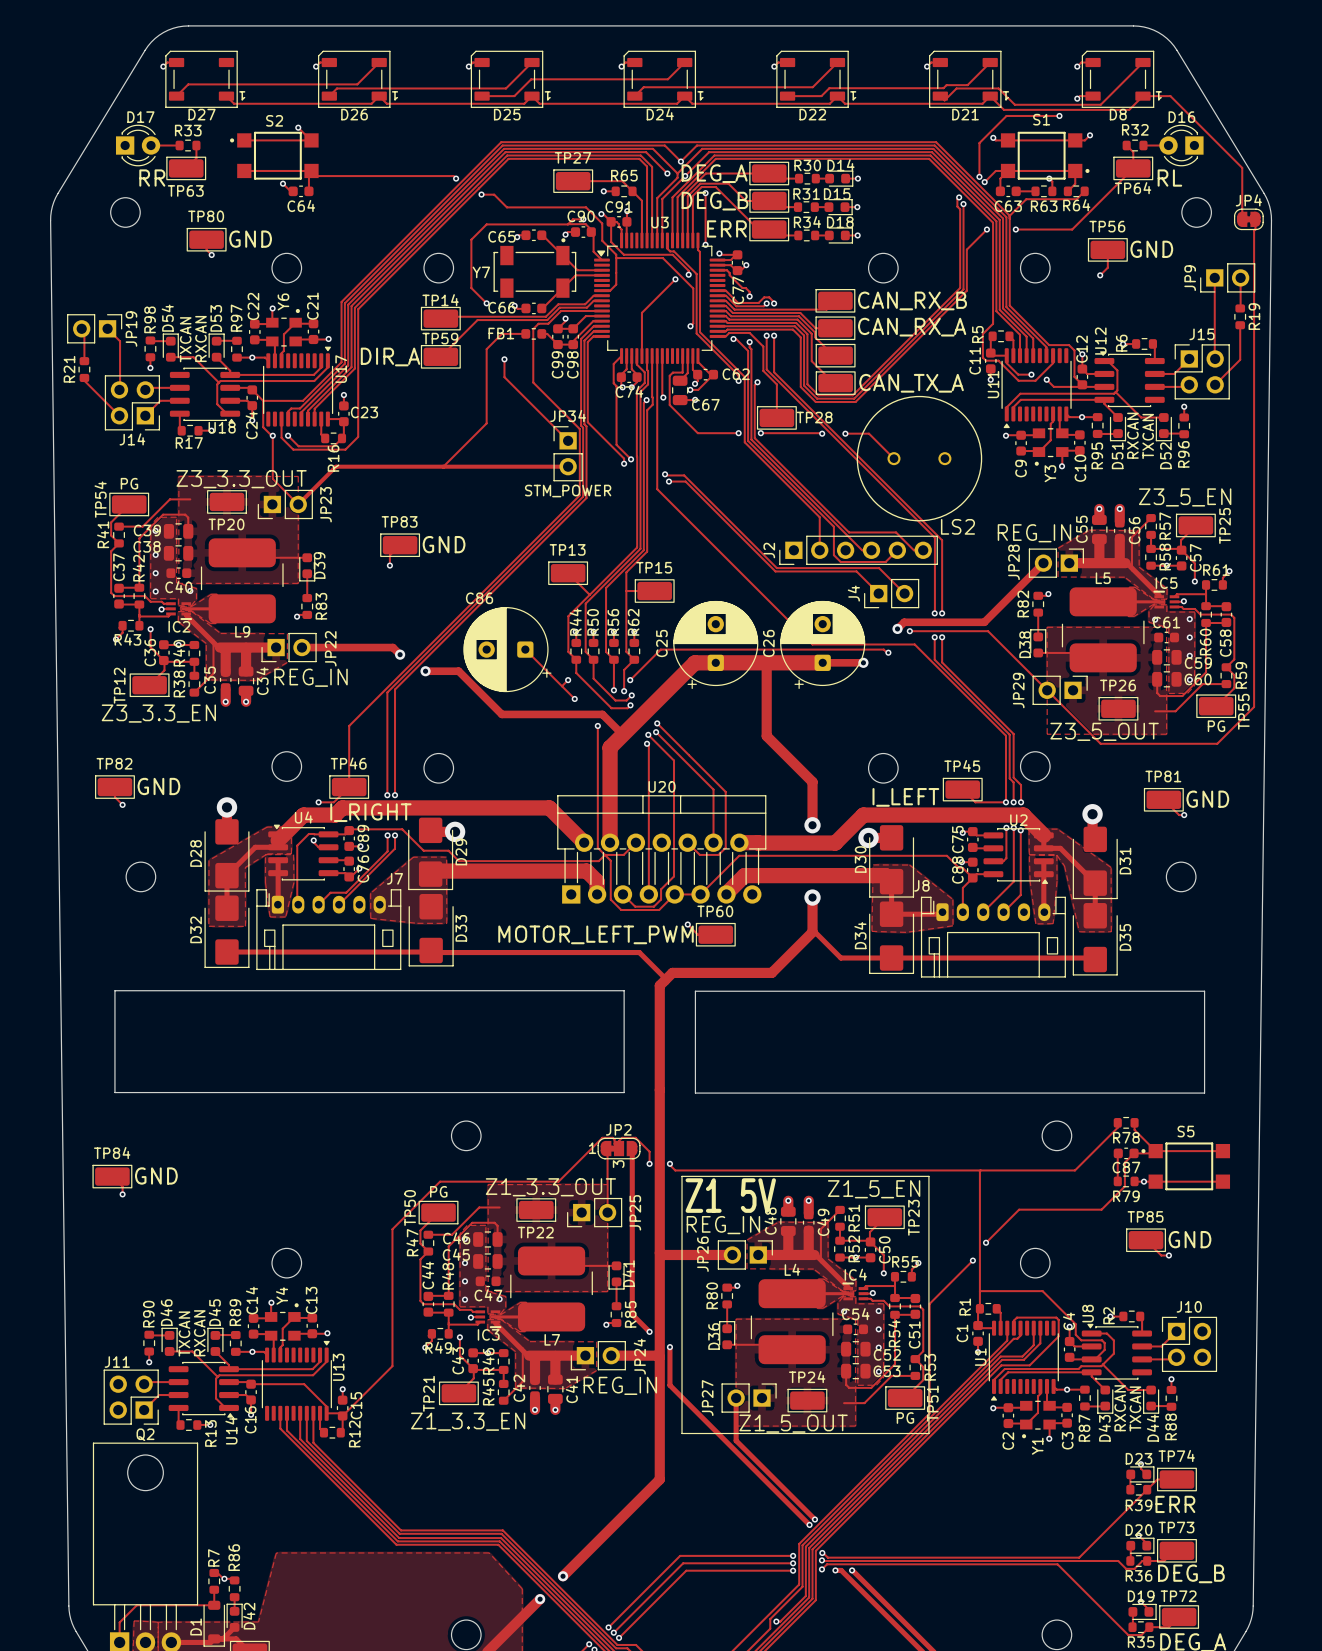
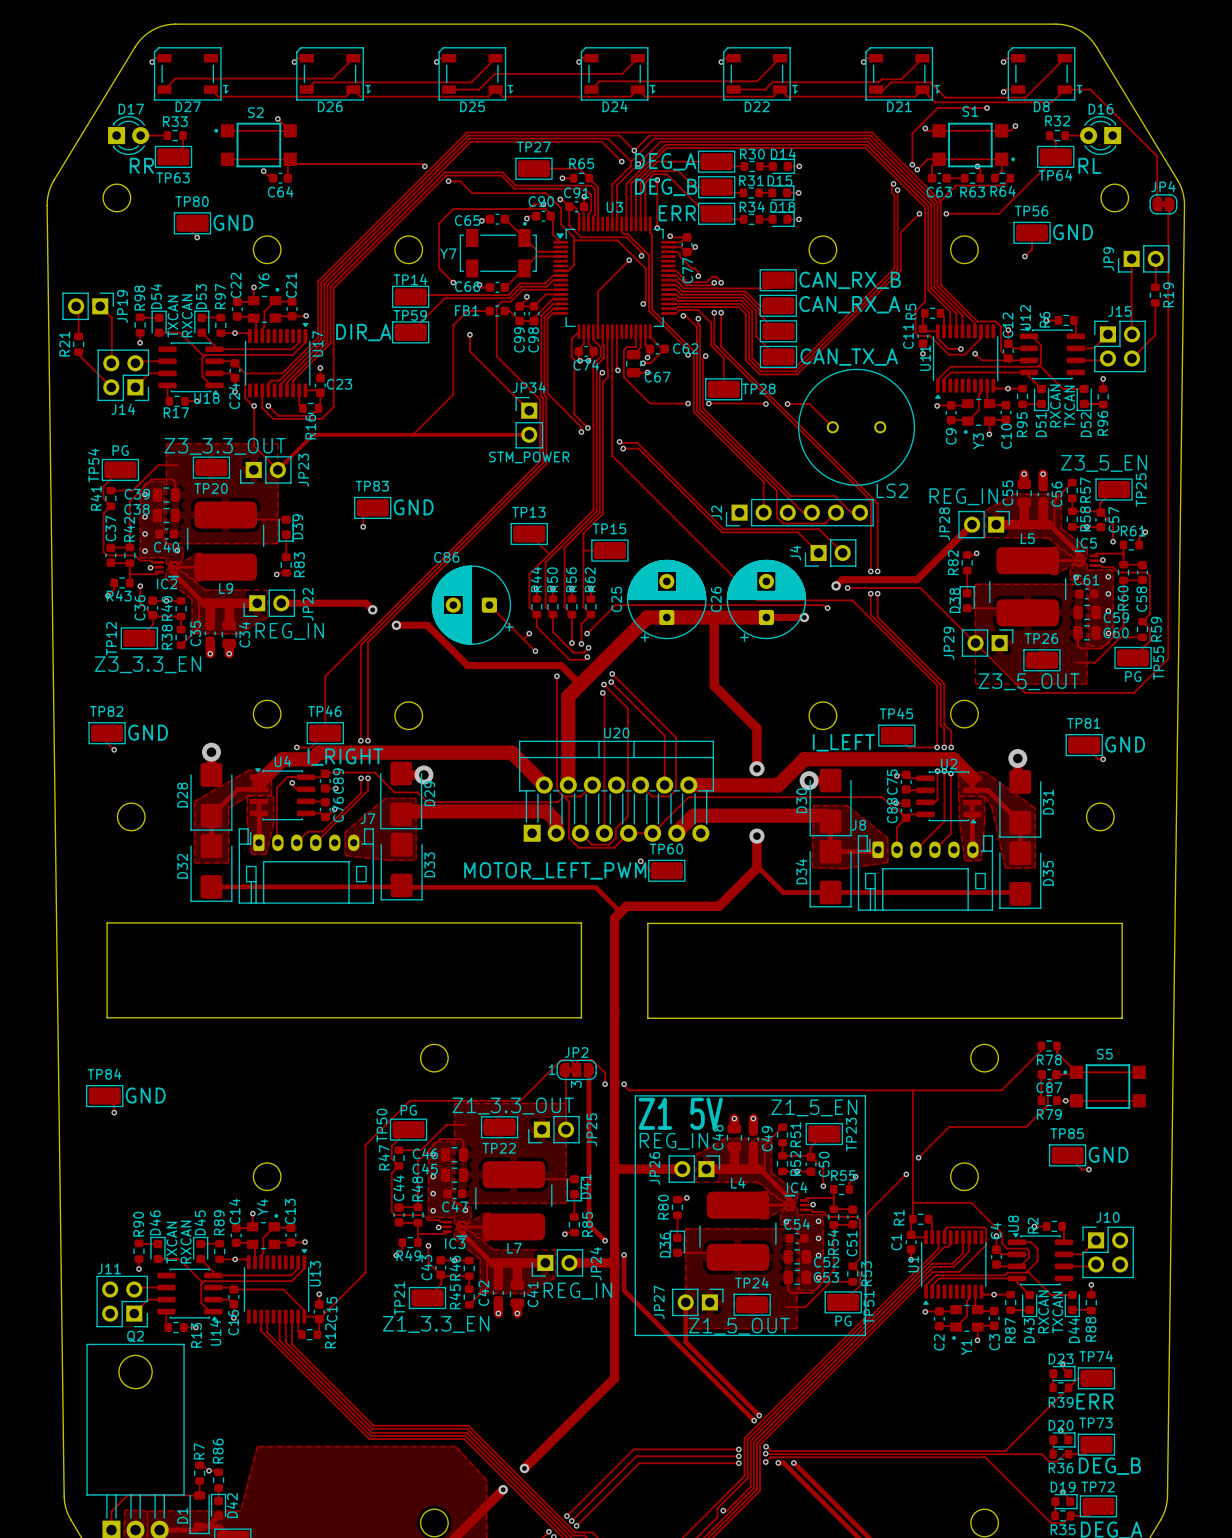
track: (477, 185) (507, 155) (640, 155) (652, 166) (652, 240) -> (444, 172) (502, 172) (515, 185) (591, 185) (594, 189) (593, 224)
track: (478, 188) (508, 158) (639, 158) (647, 166) (647, 240) -> (446, 175) (501, 175) (514, 188) (584, 188) (591, 195) (588, 224)

